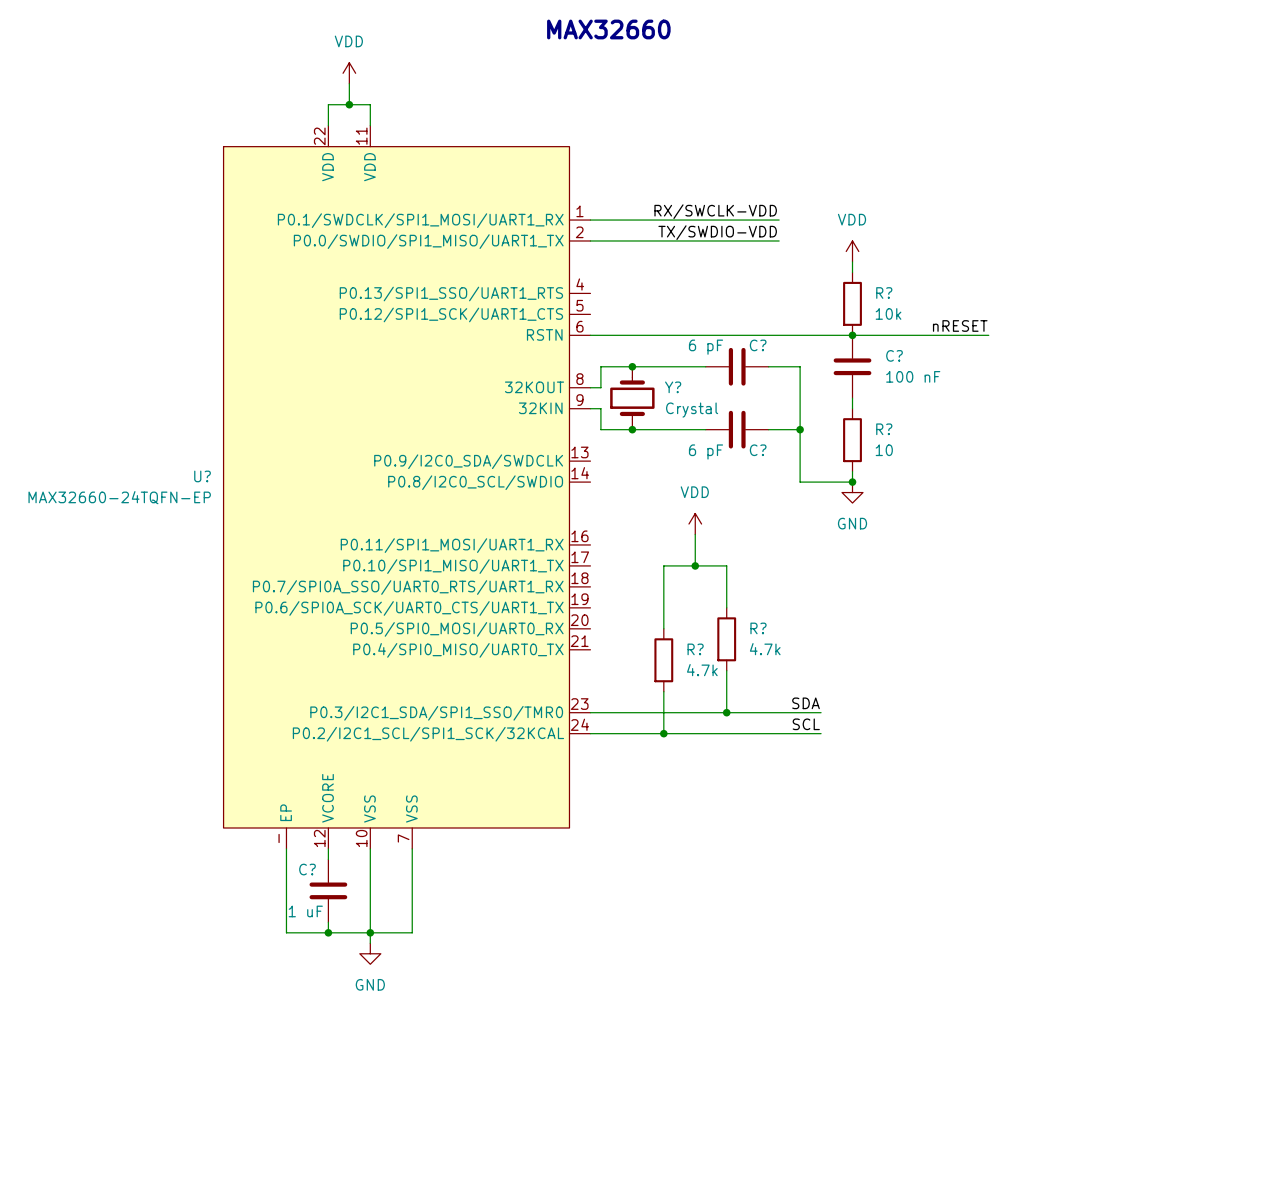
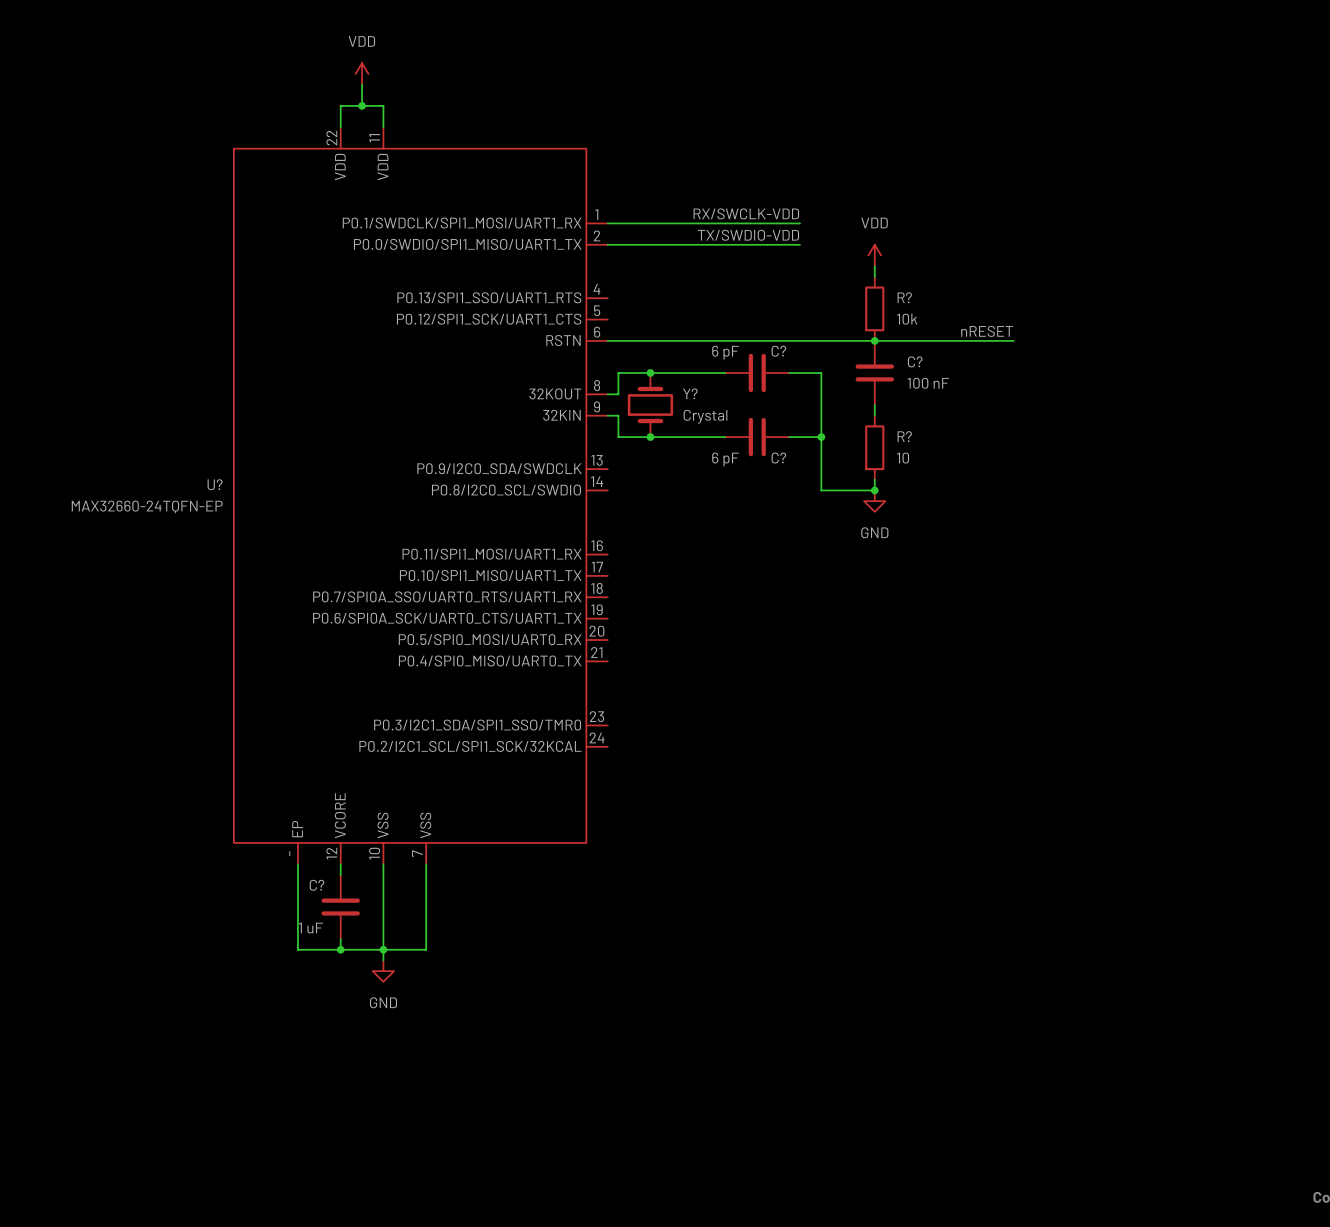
text: MAX32660 (608, 29) -> none
power symbol: VDD (695, 524) -> none
wire: (695, 534) (695, 565) -> none
junction: (695, 565) -> none
wire: (726, 607) (726, 565) (663, 565) (663, 628) -> none
R?: 4.7k (726, 639) -> none
R?: 4.7k (663, 660) -> none
wire: (726, 670) (726, 712) -> none
wire: (663, 691) (663, 733) -> none
label: SDA (806, 703) -> none
wire: (590, 712) (821, 712) -> none
junction: (726, 712) -> none
label: SCL (806, 724) -> none
wire: (590, 733) (821, 733) -> none
junction: (663, 733) -> none

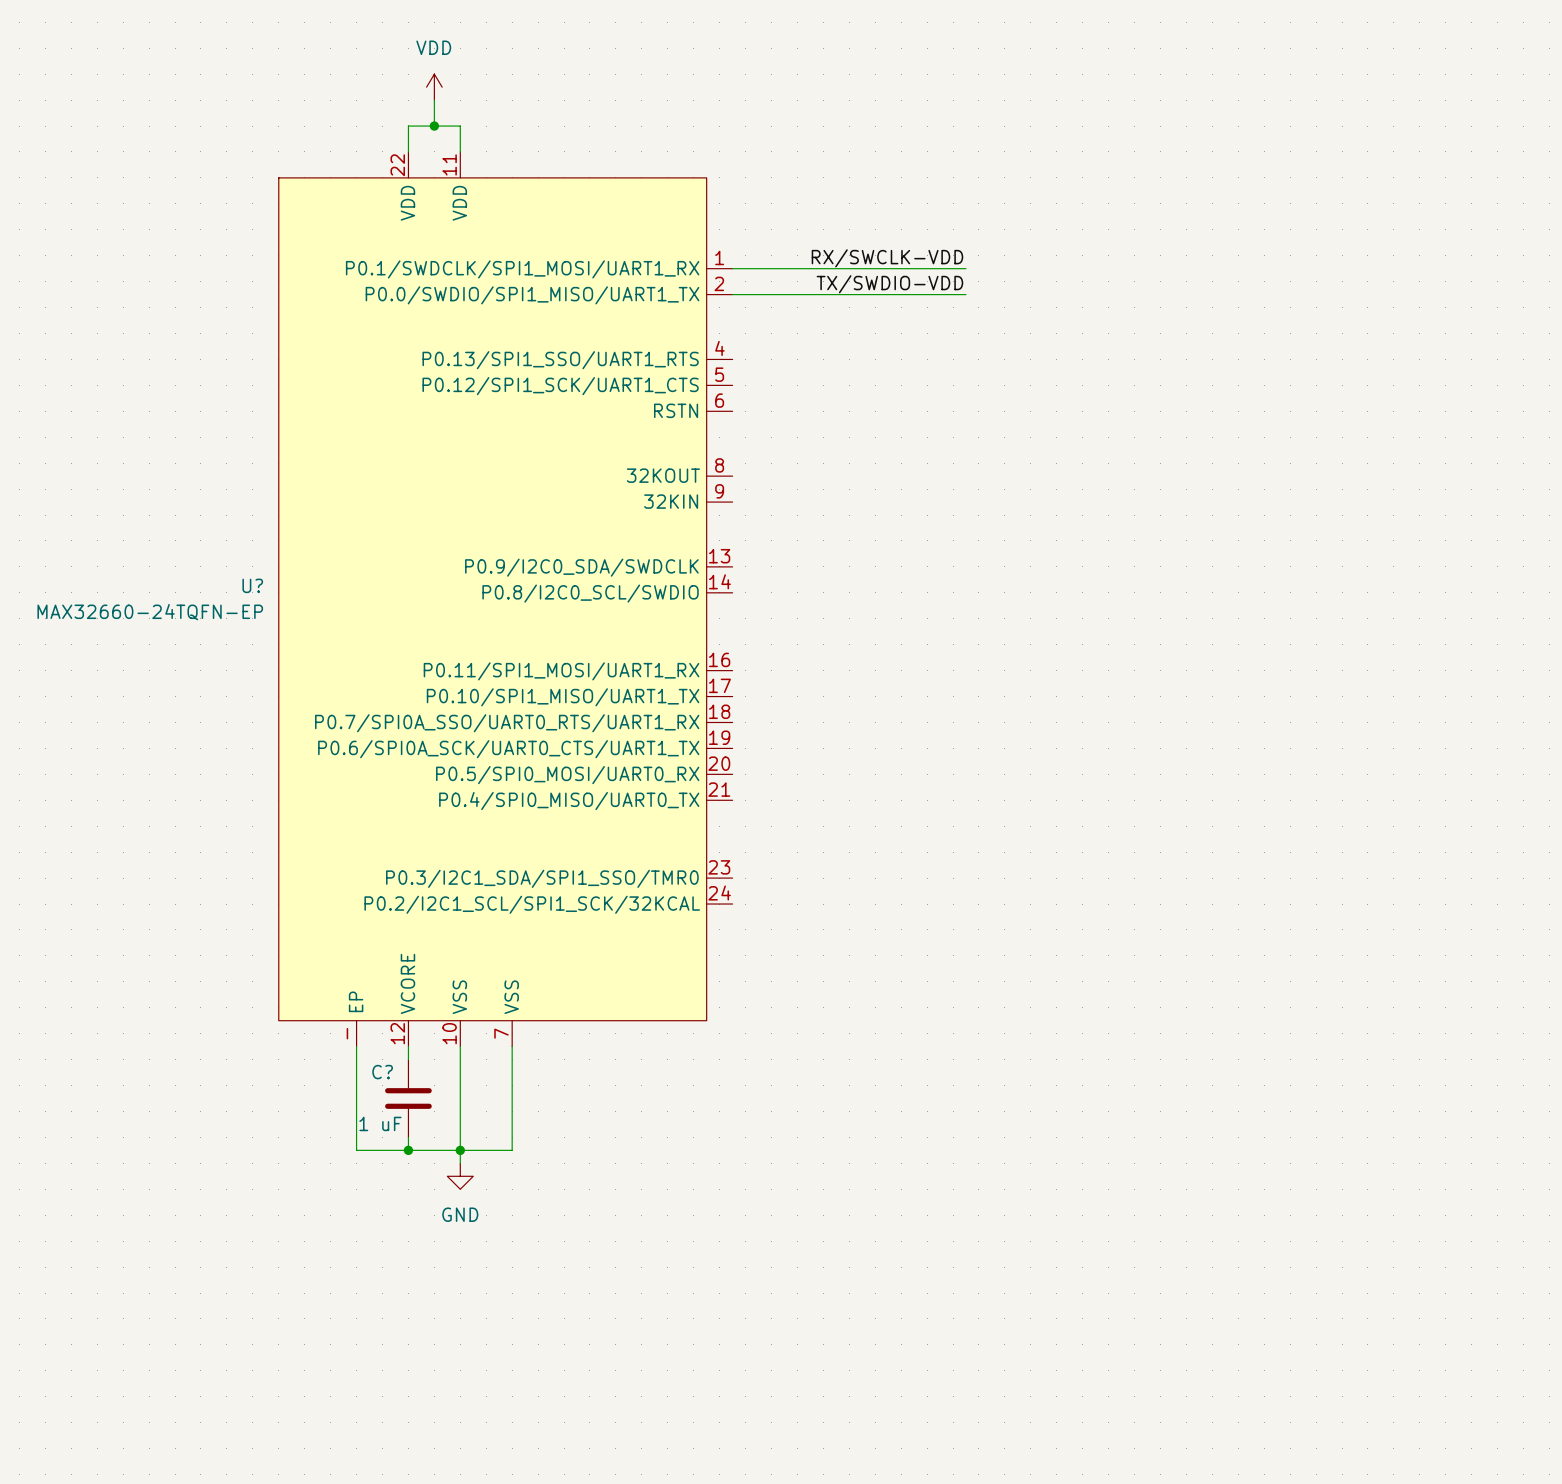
power symbol: VDD (874, 255) -> none
wire: (874, 266) (874, 276) -> none
R?: 10k (874, 308) -> none
label: nRESET (987, 331) -> none
wire: (607, 340) (1013, 340) -> none
junction: (874, 340) -> none
junction: (650, 372) -> none
wire: (725, 372) (618, 372) (618, 394) (607, 394) -> none
C?: 6 pF (757, 372) -> none
wire: (789, 372) (821, 372) (821, 490) (874, 490) (874, 479) -> none
C?: 100 nF (874, 372) -> none
Y?: Crystal (650, 405) -> none
wire: (874, 405) (874, 415) -> none
wire: (607, 415) (618, 415) (618, 437) (725, 437) -> none
junction: (650, 437) -> none
C?: 6 pF (757, 437) -> none
wire: (789, 437) (821, 437) -> none
junction: (821, 437) -> none
R?: 10 (874, 447) -> none
junction: (874, 490) -> none
power symbol: GND (874, 501) -> none

